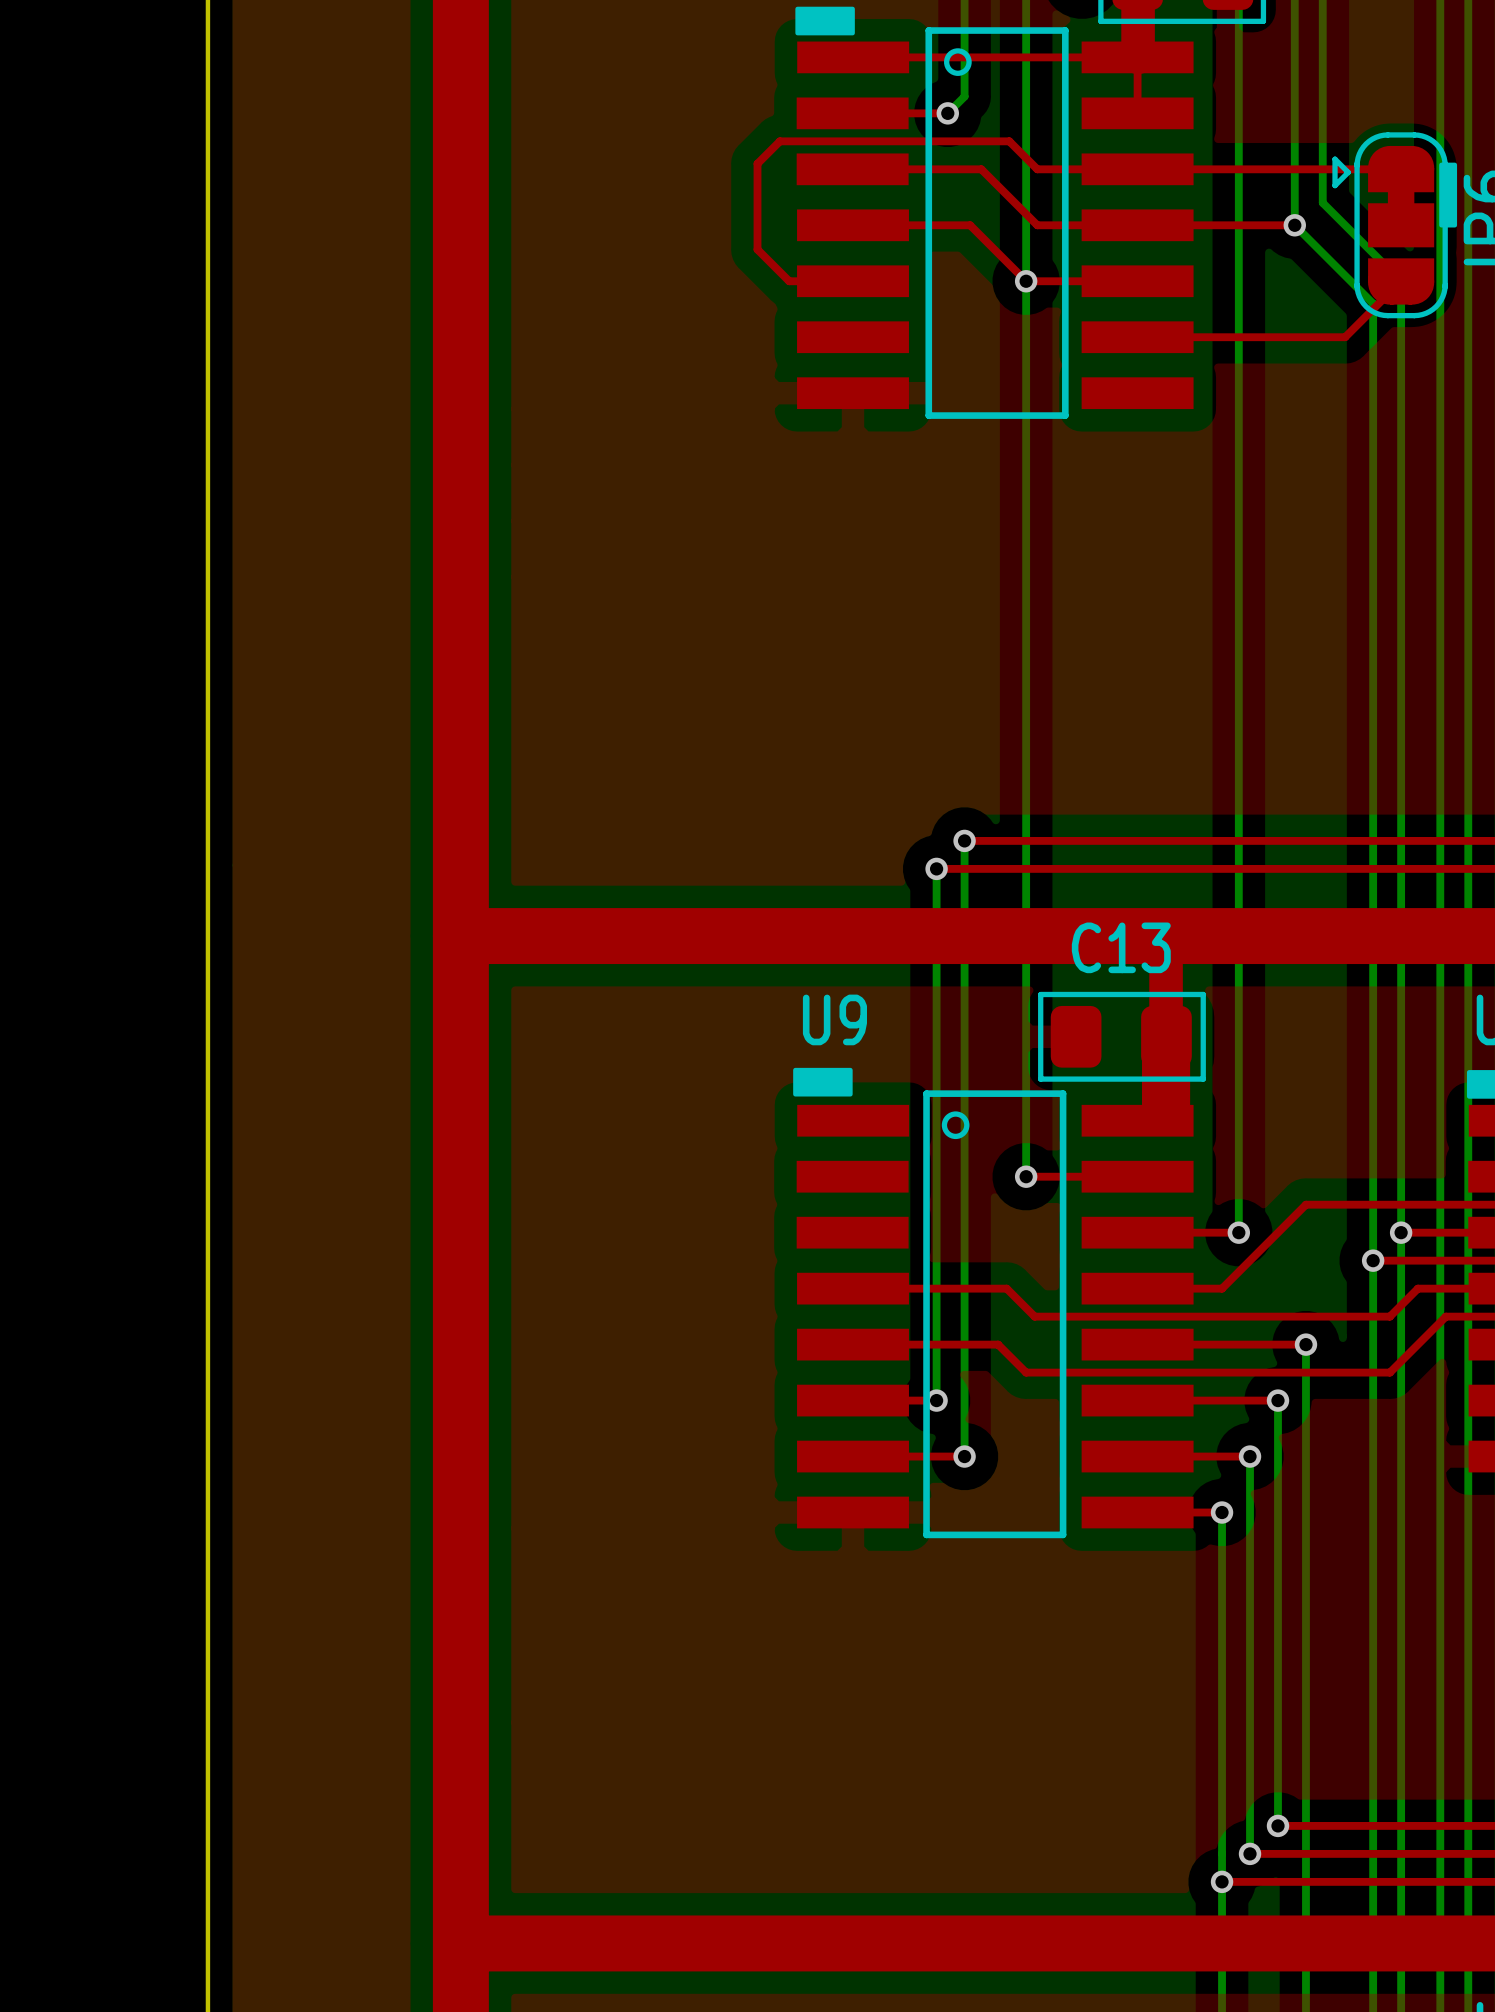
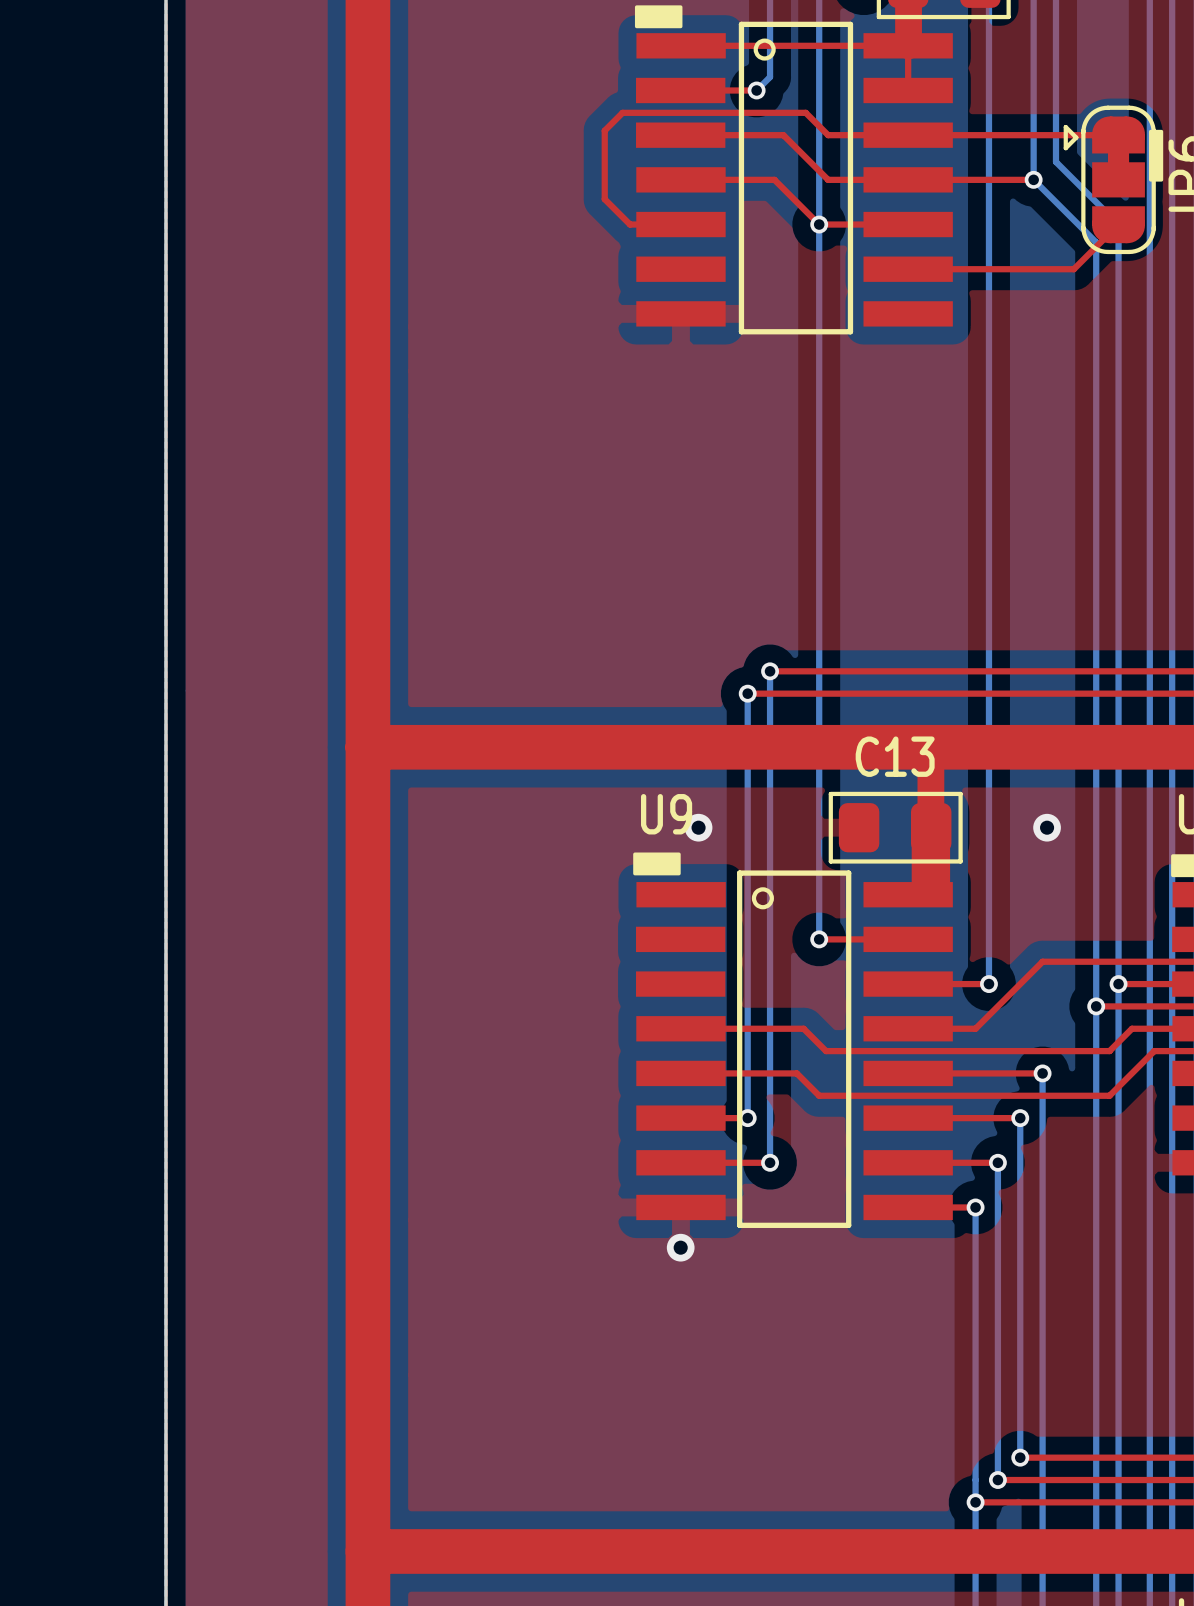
via: none -> (698, 827)
via: none -> (1047, 827)
via: none -> (680, 1247)

